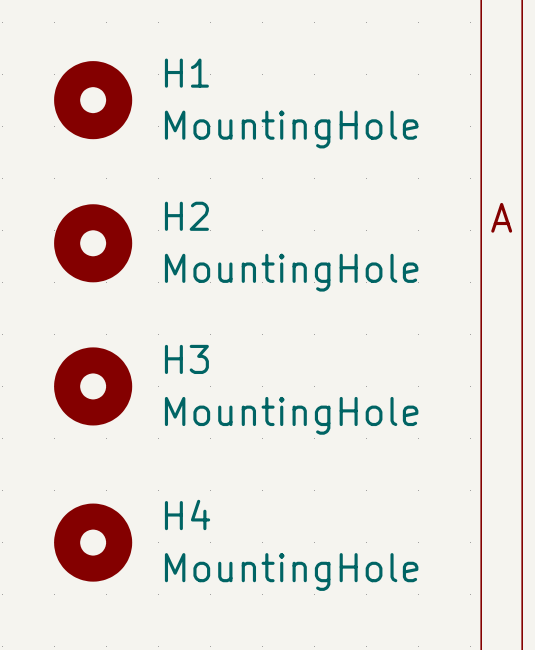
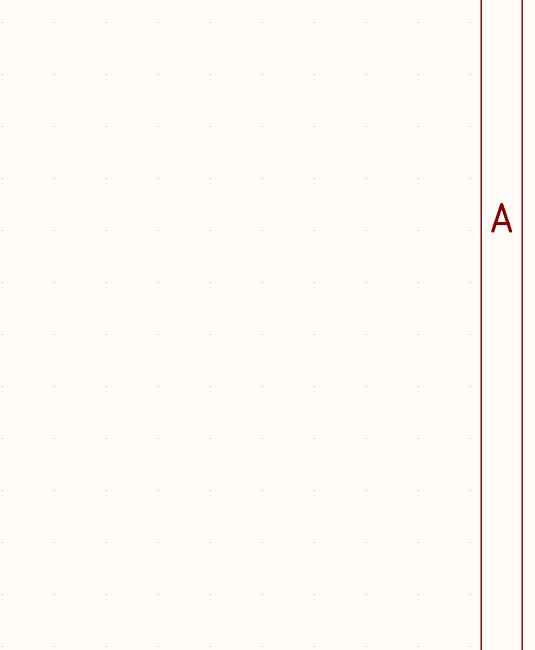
H1: MountingHole (93, 100) -> none
H2: MountingHole (93, 243) -> none
H3: MountingHole (93, 386) -> none
H4: MountingHole (93, 542) -> none

